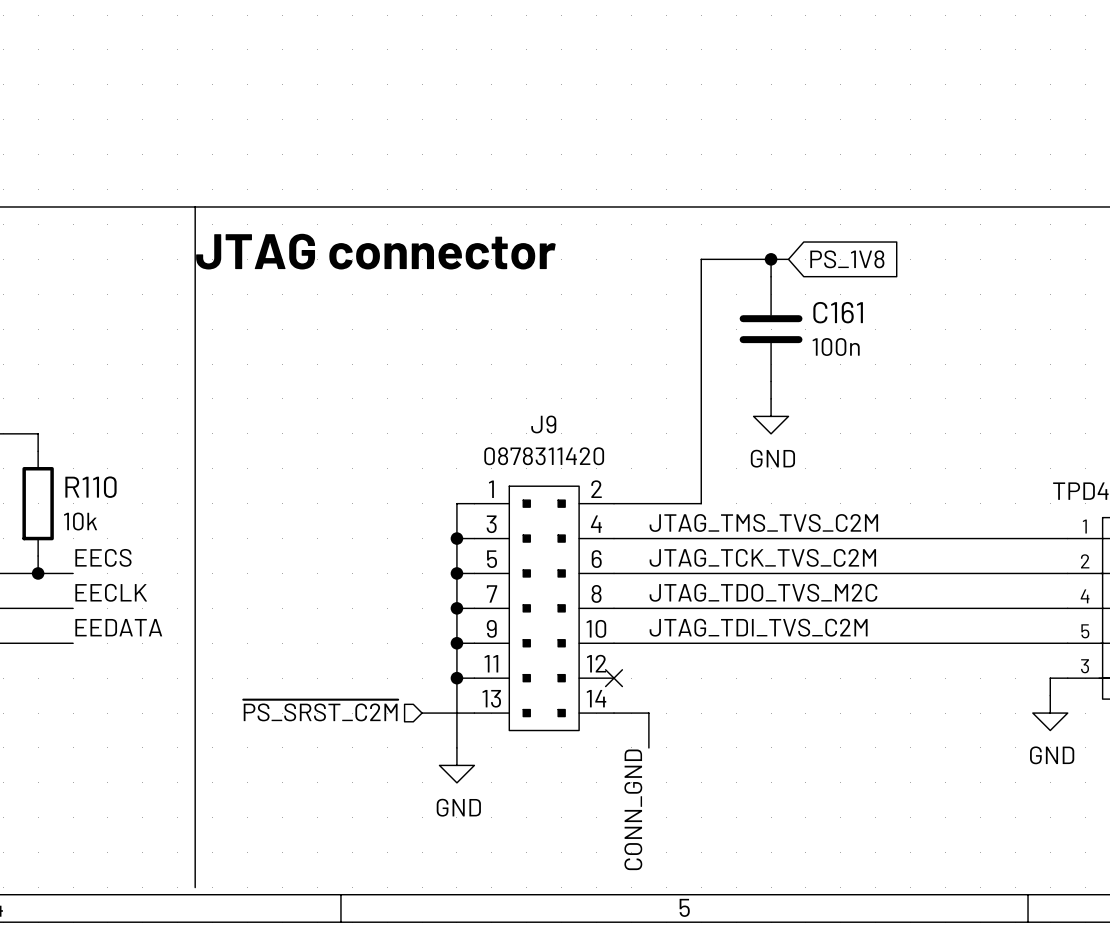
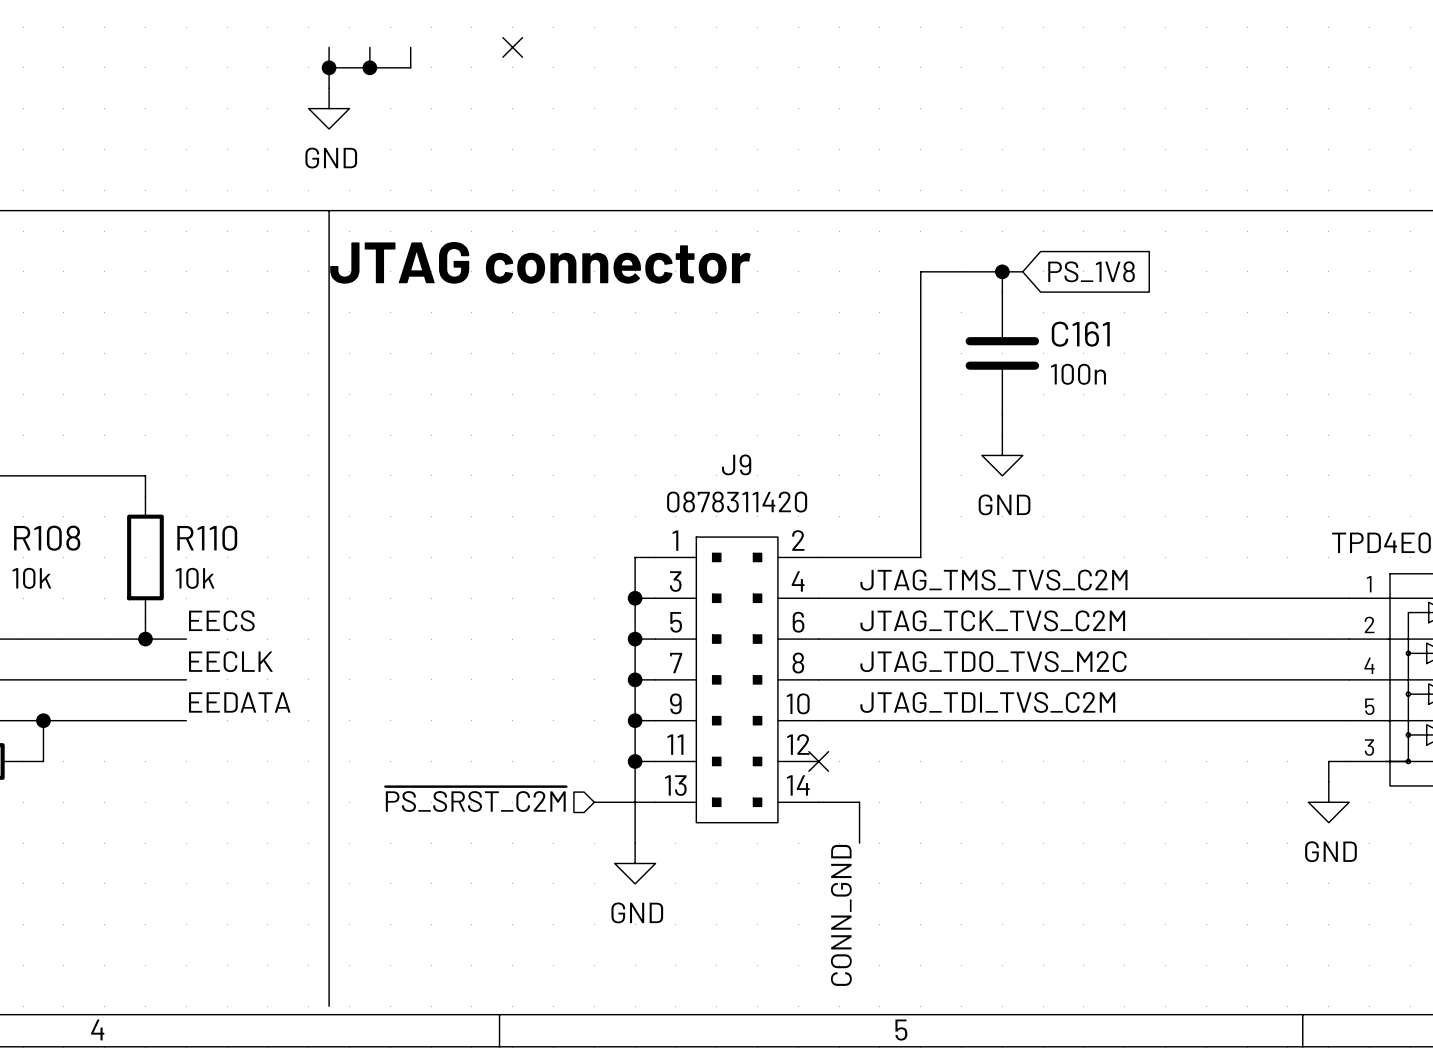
wire: none -> (329, 47) (329, 88)
wire: none -> (369, 47) (369, 67)
wire: none -> (410, 47) (410, 67) (329, 67)
no-connect mark: none -> (512, 47)
junction: none -> (329, 67)
junction: none -> (369, 67)
power symbol: none -> GND (329, 108)

